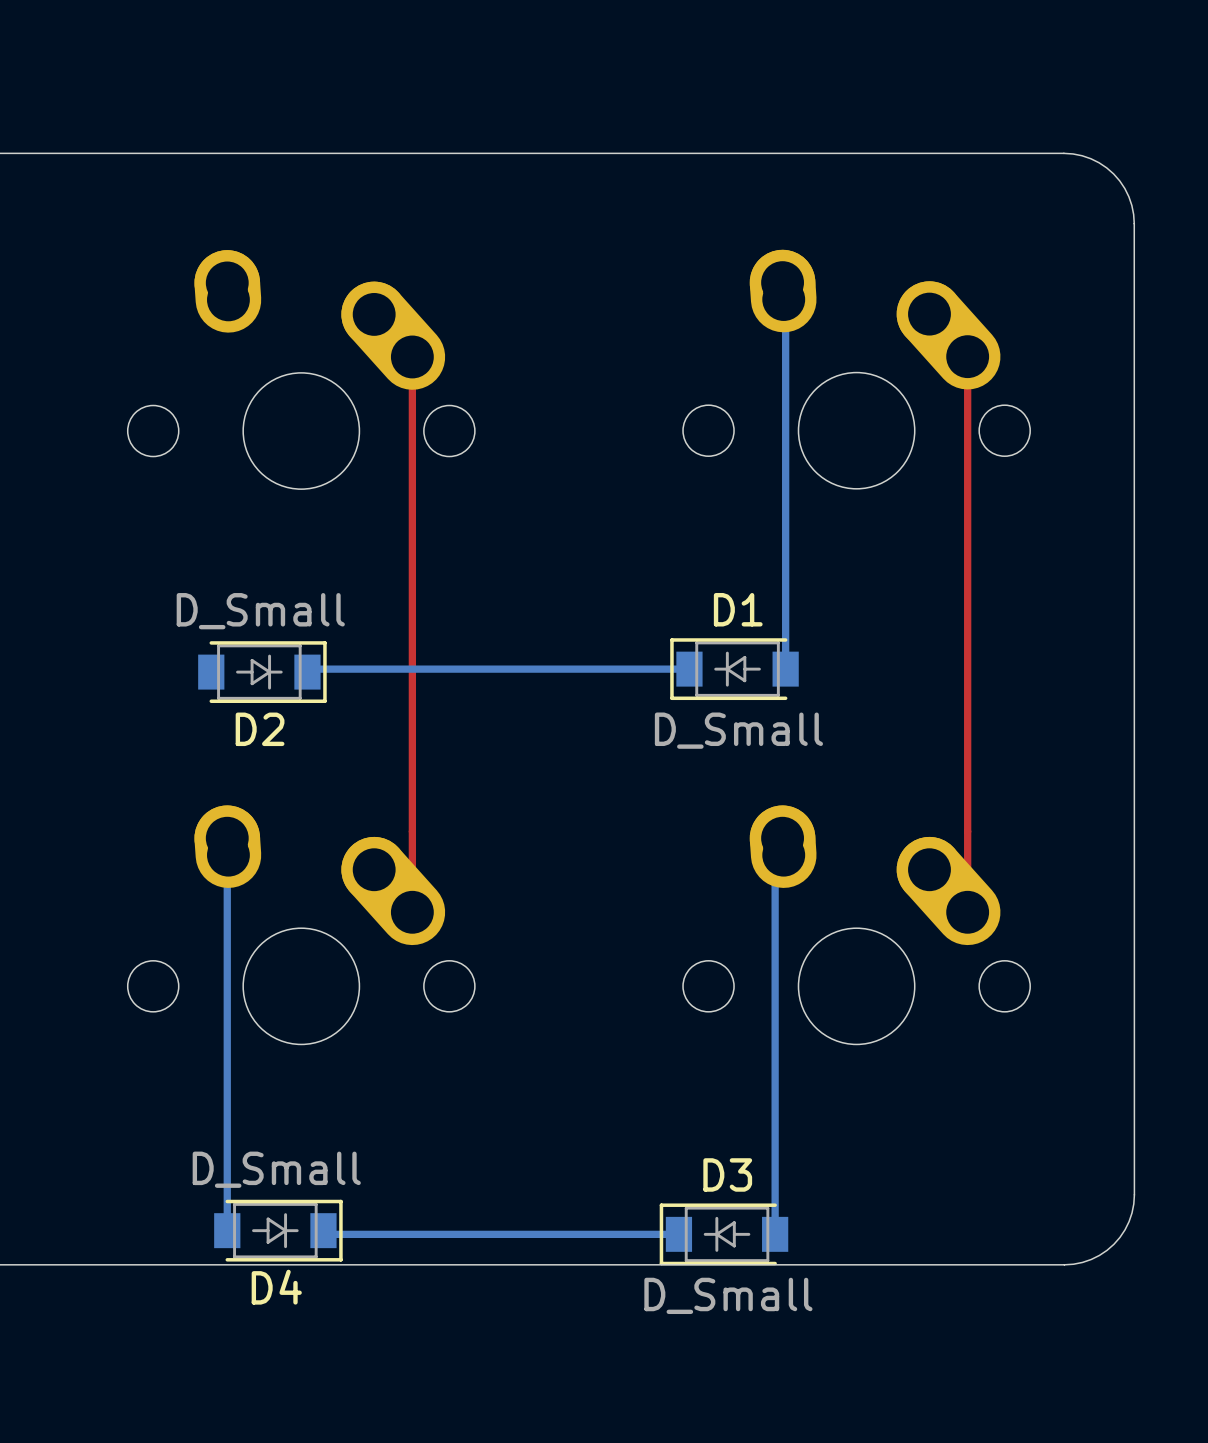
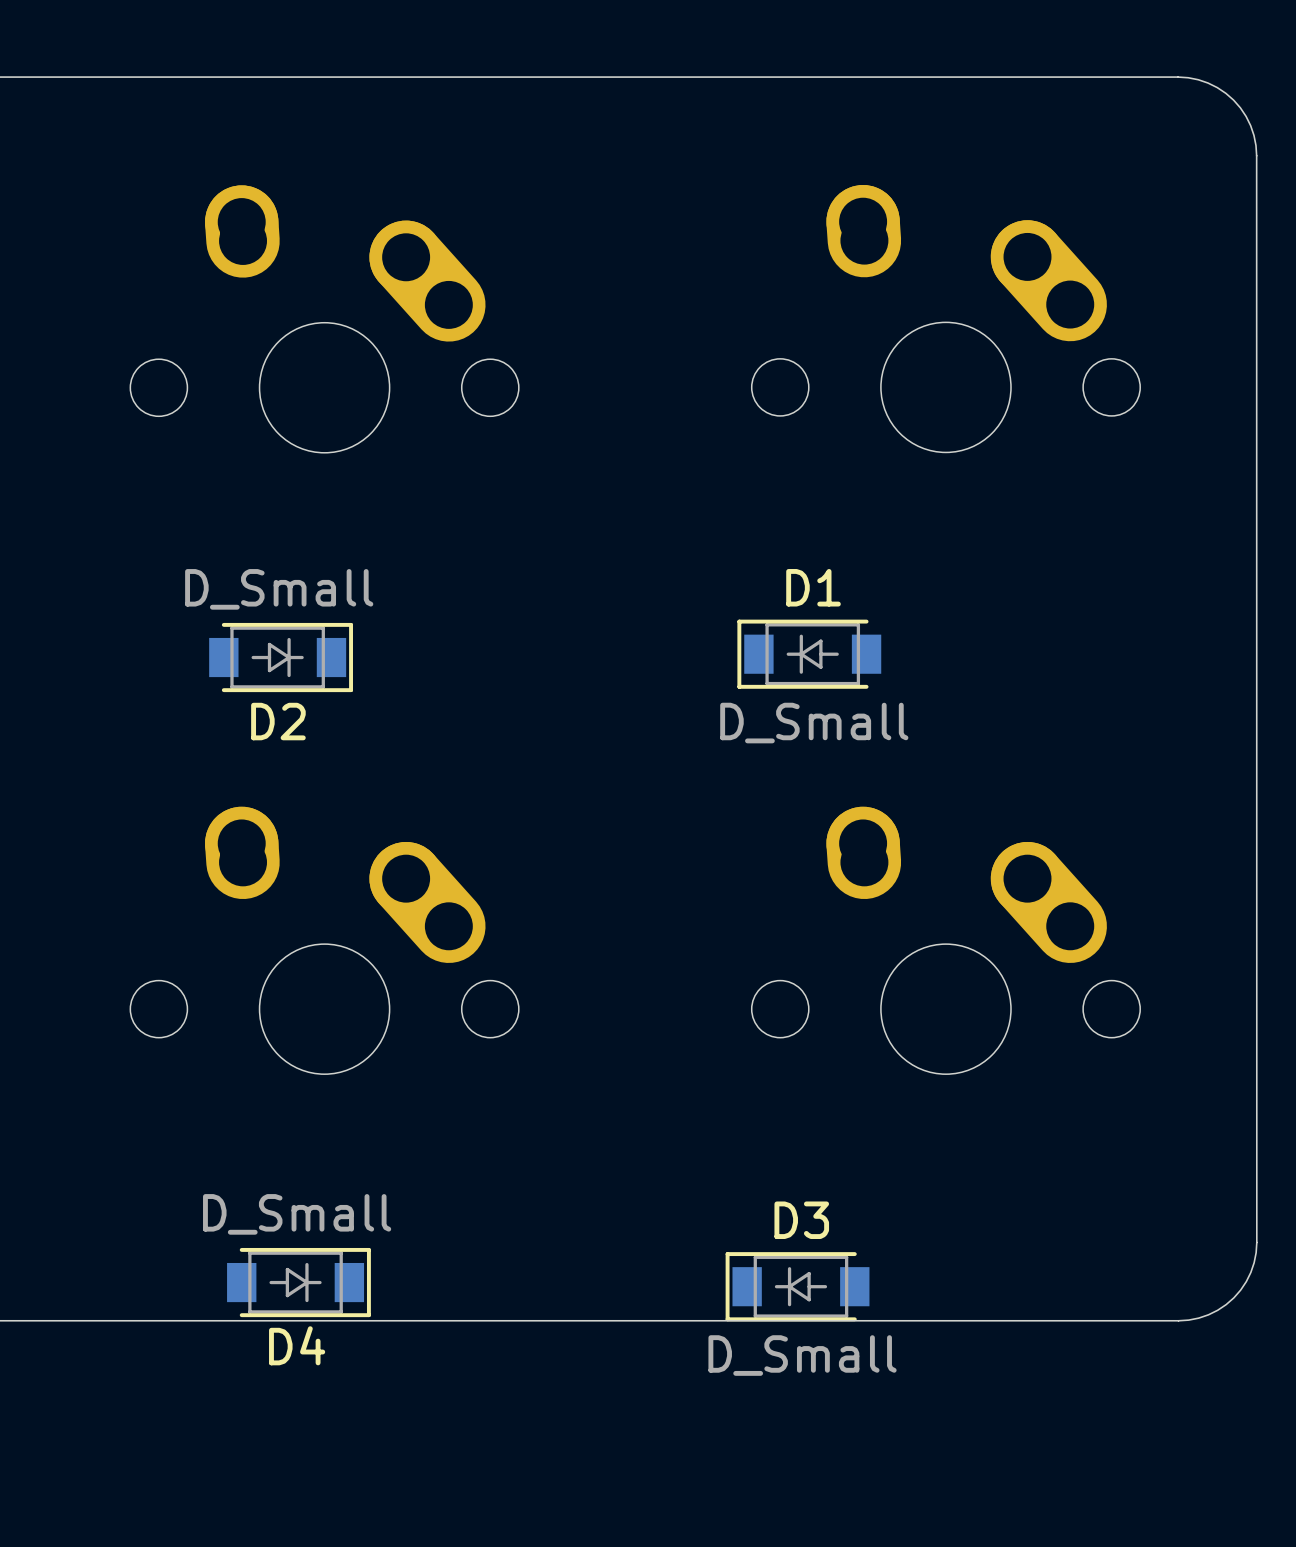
bottom track: (783, 299) (785, 301) (785, 669) -> none
top track: (412, 356) (412, 912) -> none
top track: (967, 356) (967, 912) -> none
bottom track: (689, 669) (310, 669) (307, 672) -> none
bottom track: (228, 855) (227, 1230) -> none
bottom track: (783, 855) (775, 863) (775, 1234) -> none
bottom track: (323, 1230) (327, 1234) (678, 1234) -> none

